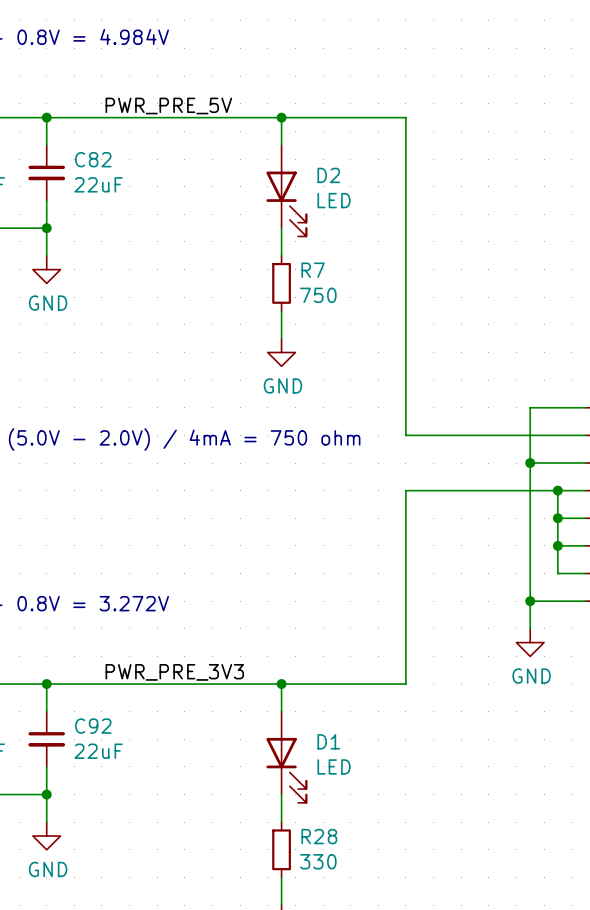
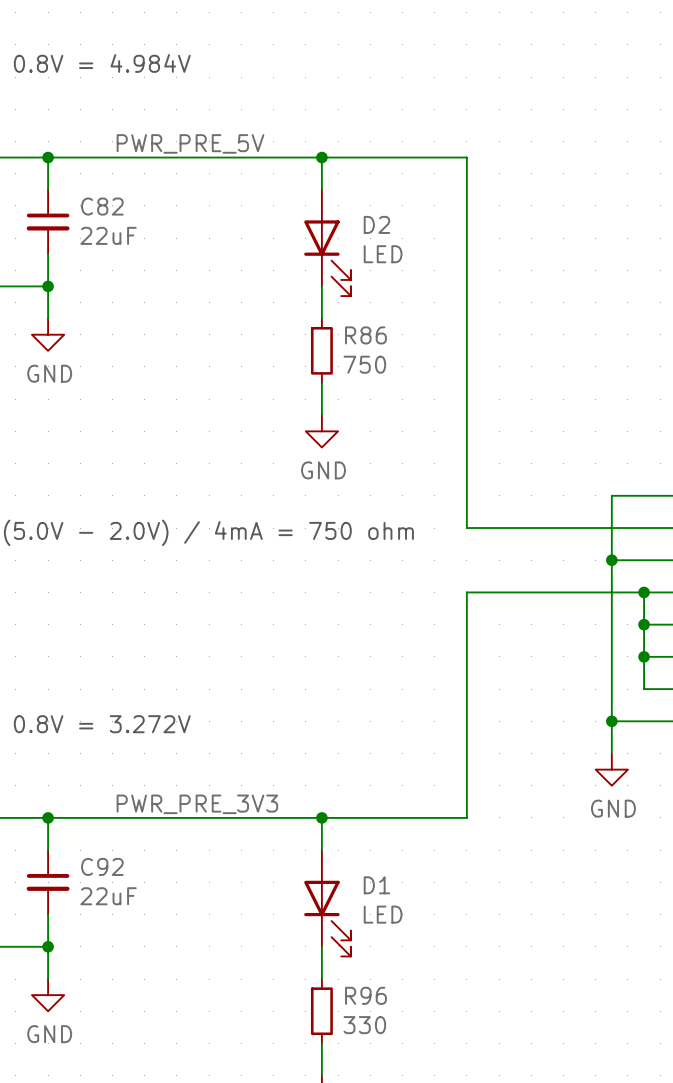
R7 name: R7 (313, 270) -> R86 (365, 335)
R28 name: R28 (319, 836) -> R96 (365, 995)

